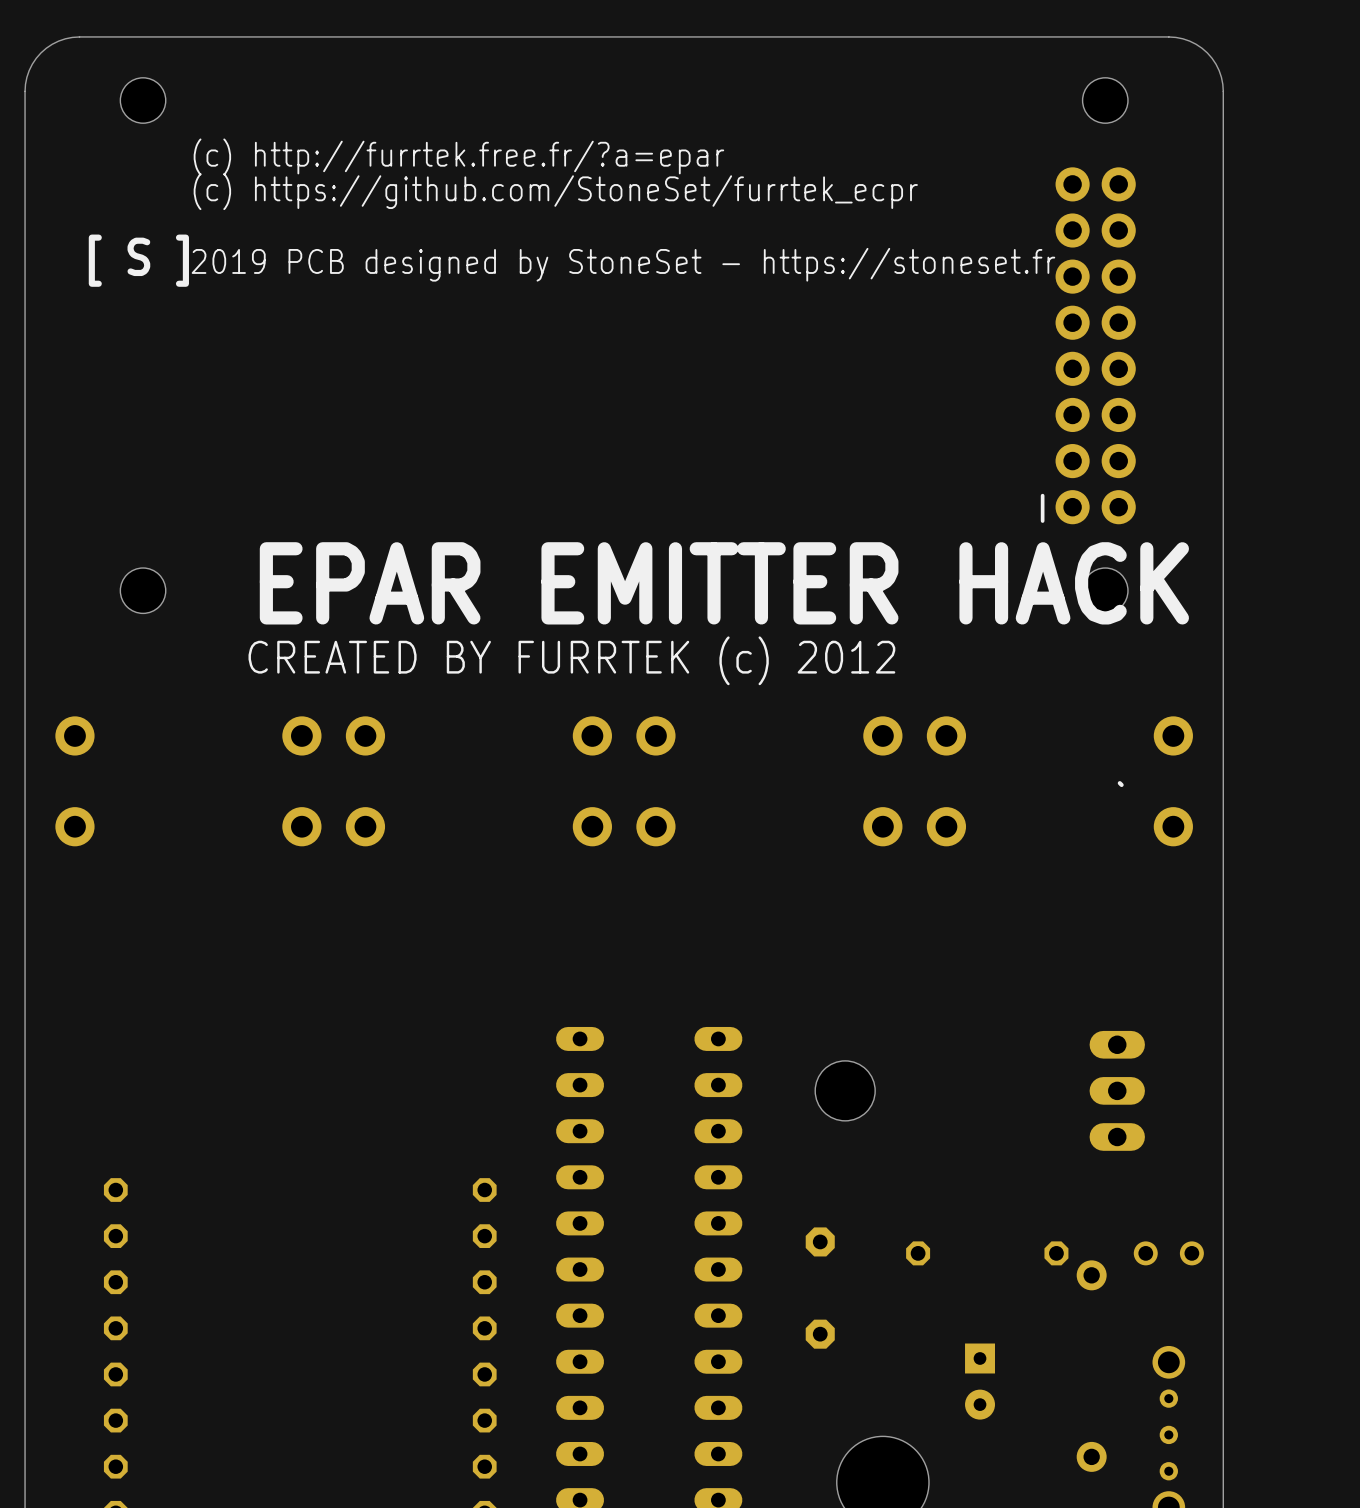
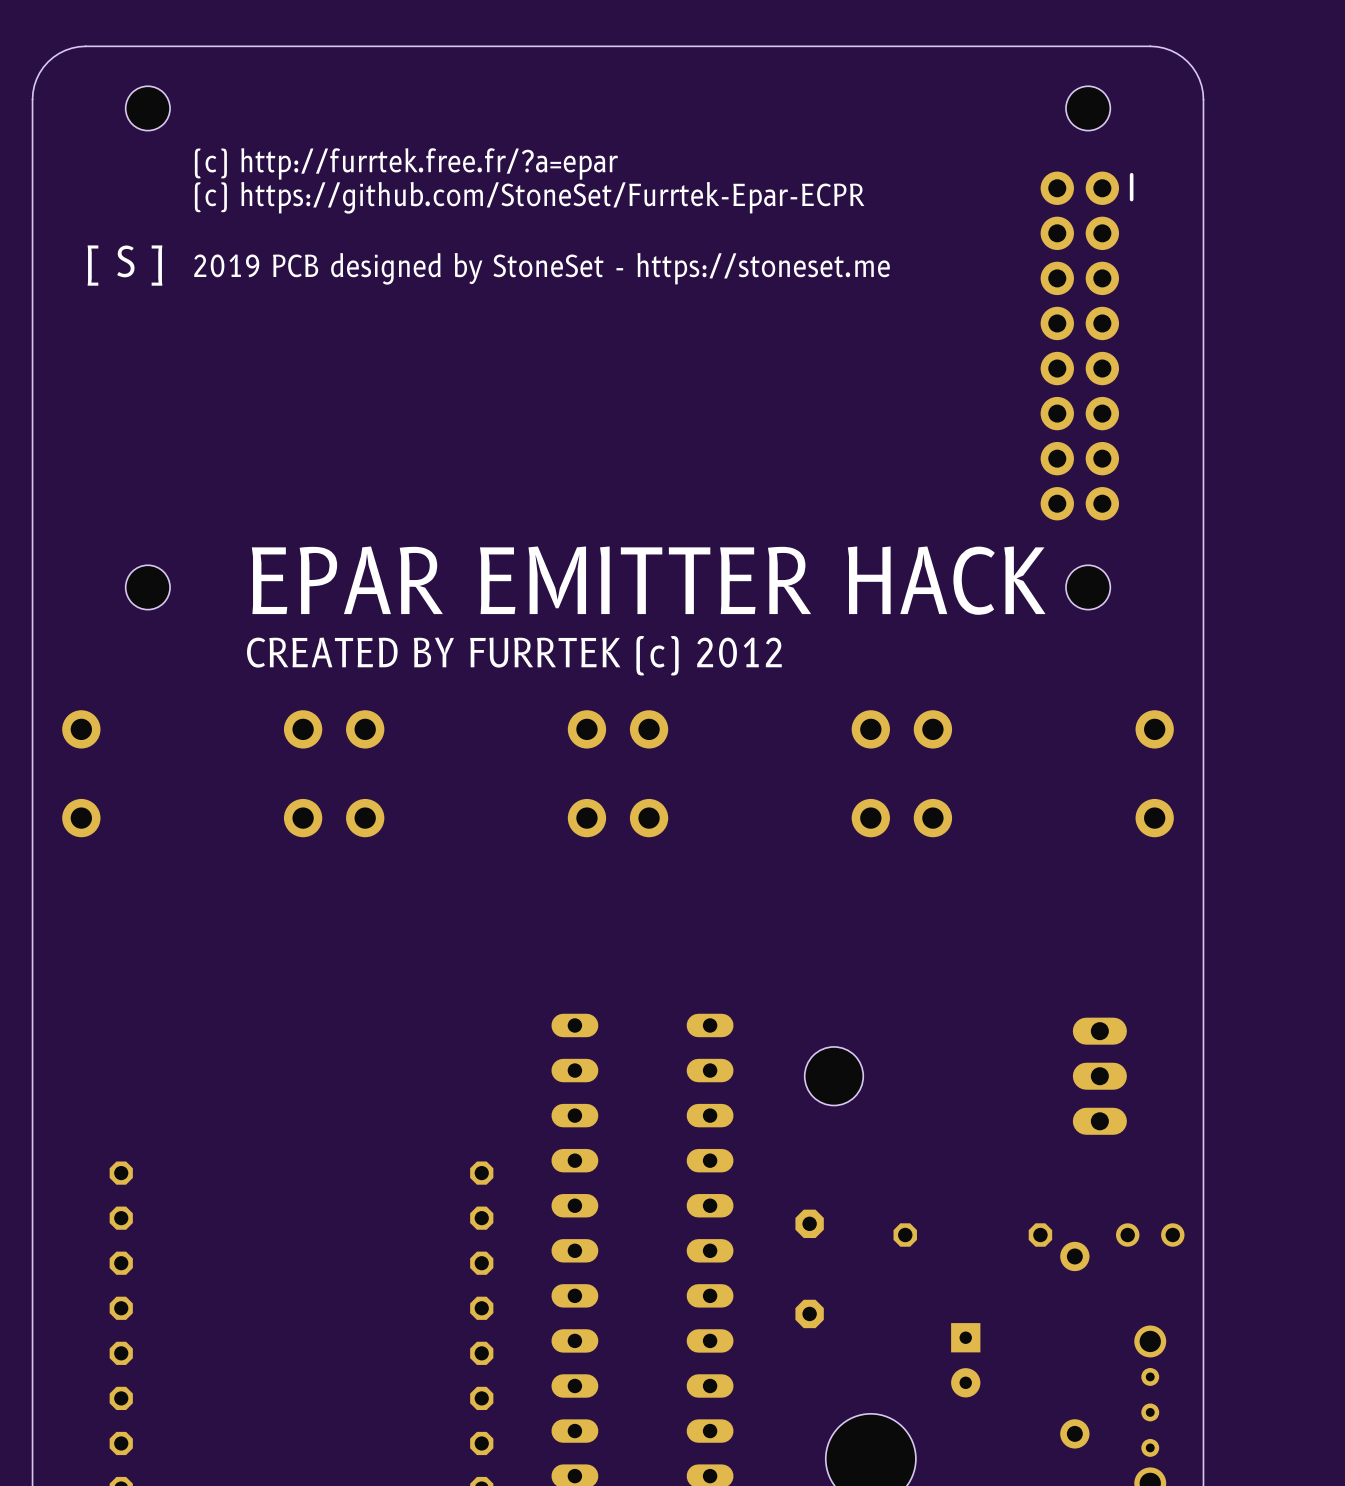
text: (c) https://github.com/StoneSet/furrtek_ecpr (555, 191) -> (c) https://github.com/StoneSet/Furrtek-Epar-ECPR (529, 197)
text: 2019 PCB designed by StoneSet - https://stoneset.fr (623, 264) -> 2019 PCB designed by StoneSet - https://stoneset.me (542, 268)
part rotation: 0° (1088, 345) -> 180° (1087, 345)
line: (1119, 783) (1121, 784) -> none

